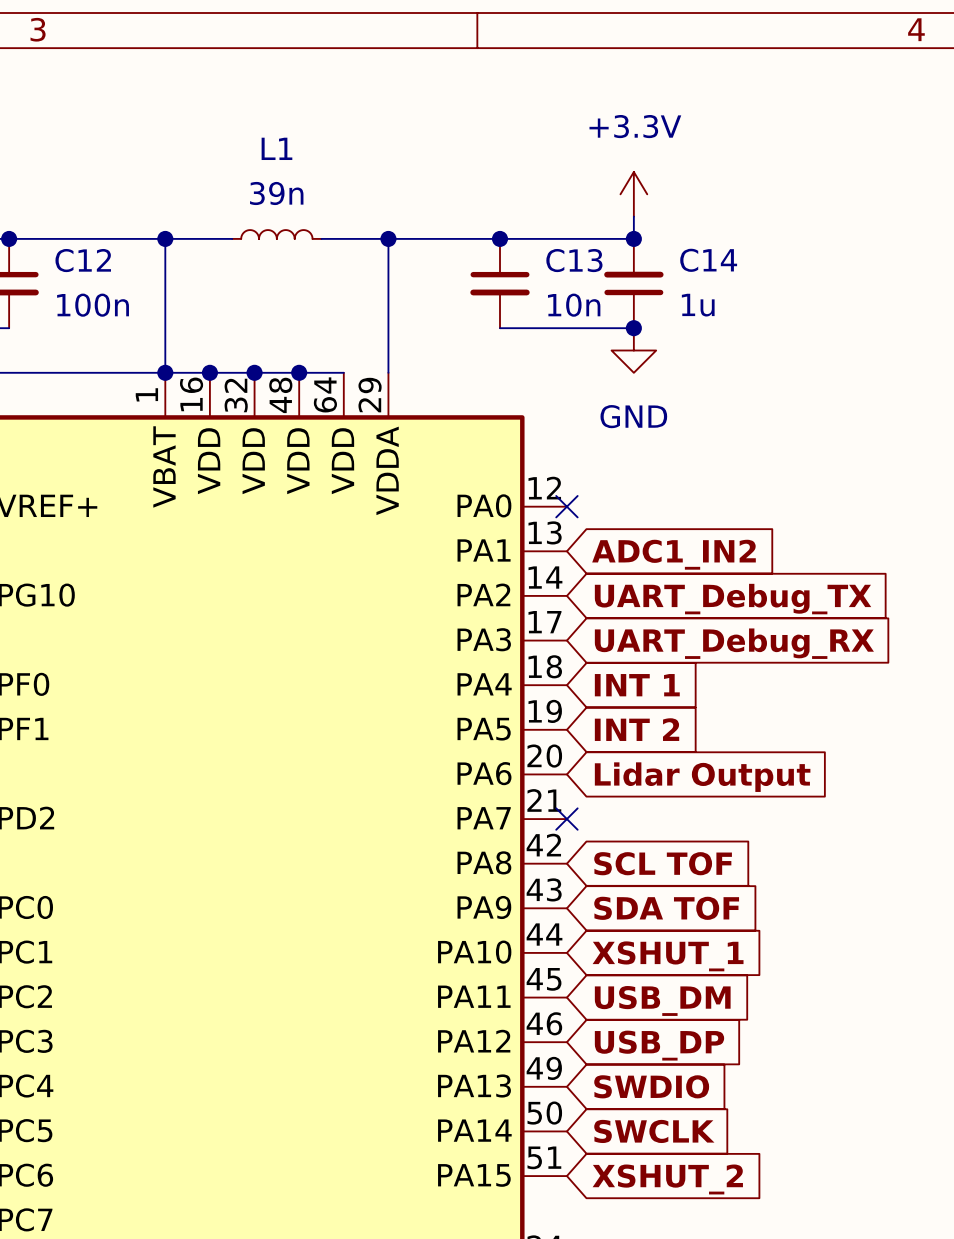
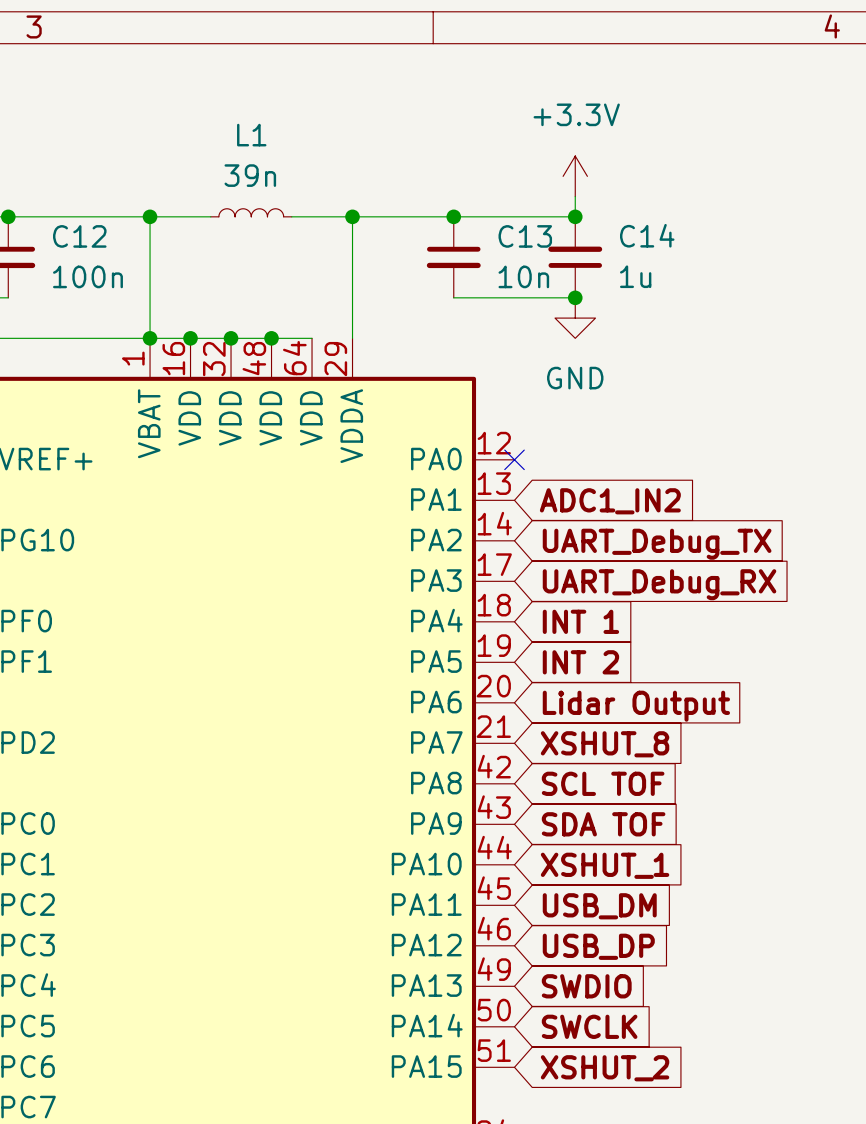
no-connect mark: (566, 819) -> none
global label: none -> XSHUT_8 (605, 744)

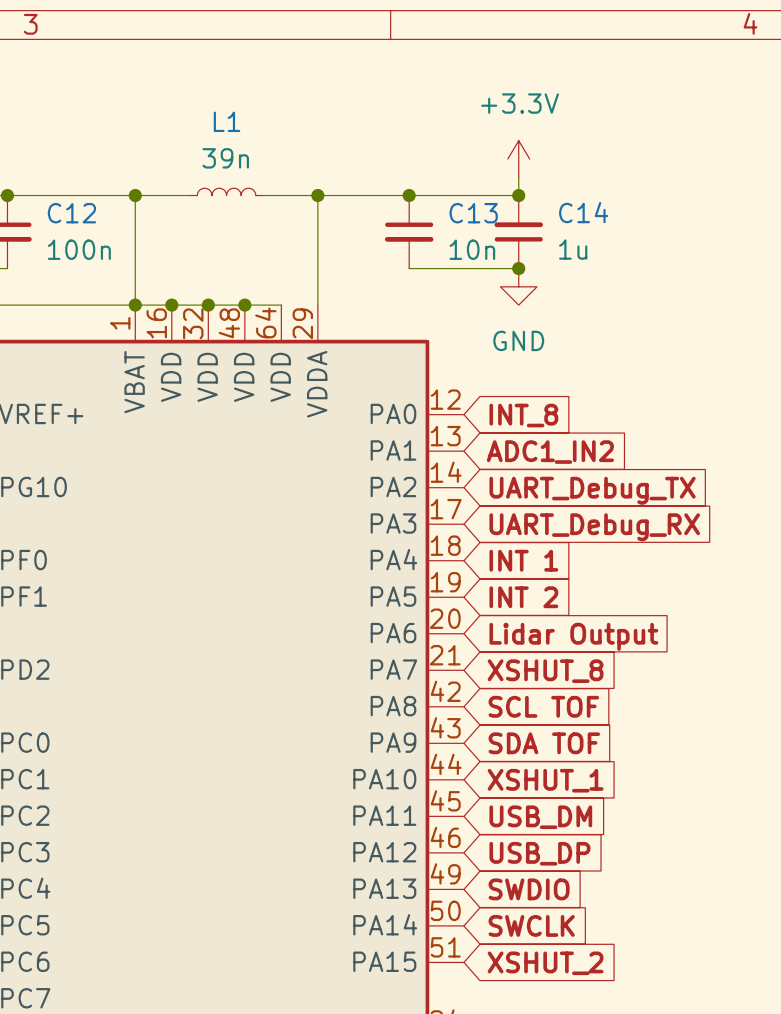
no-connect mark: (514, 459) -> none
global label: none -> INT_8 (523, 415)

